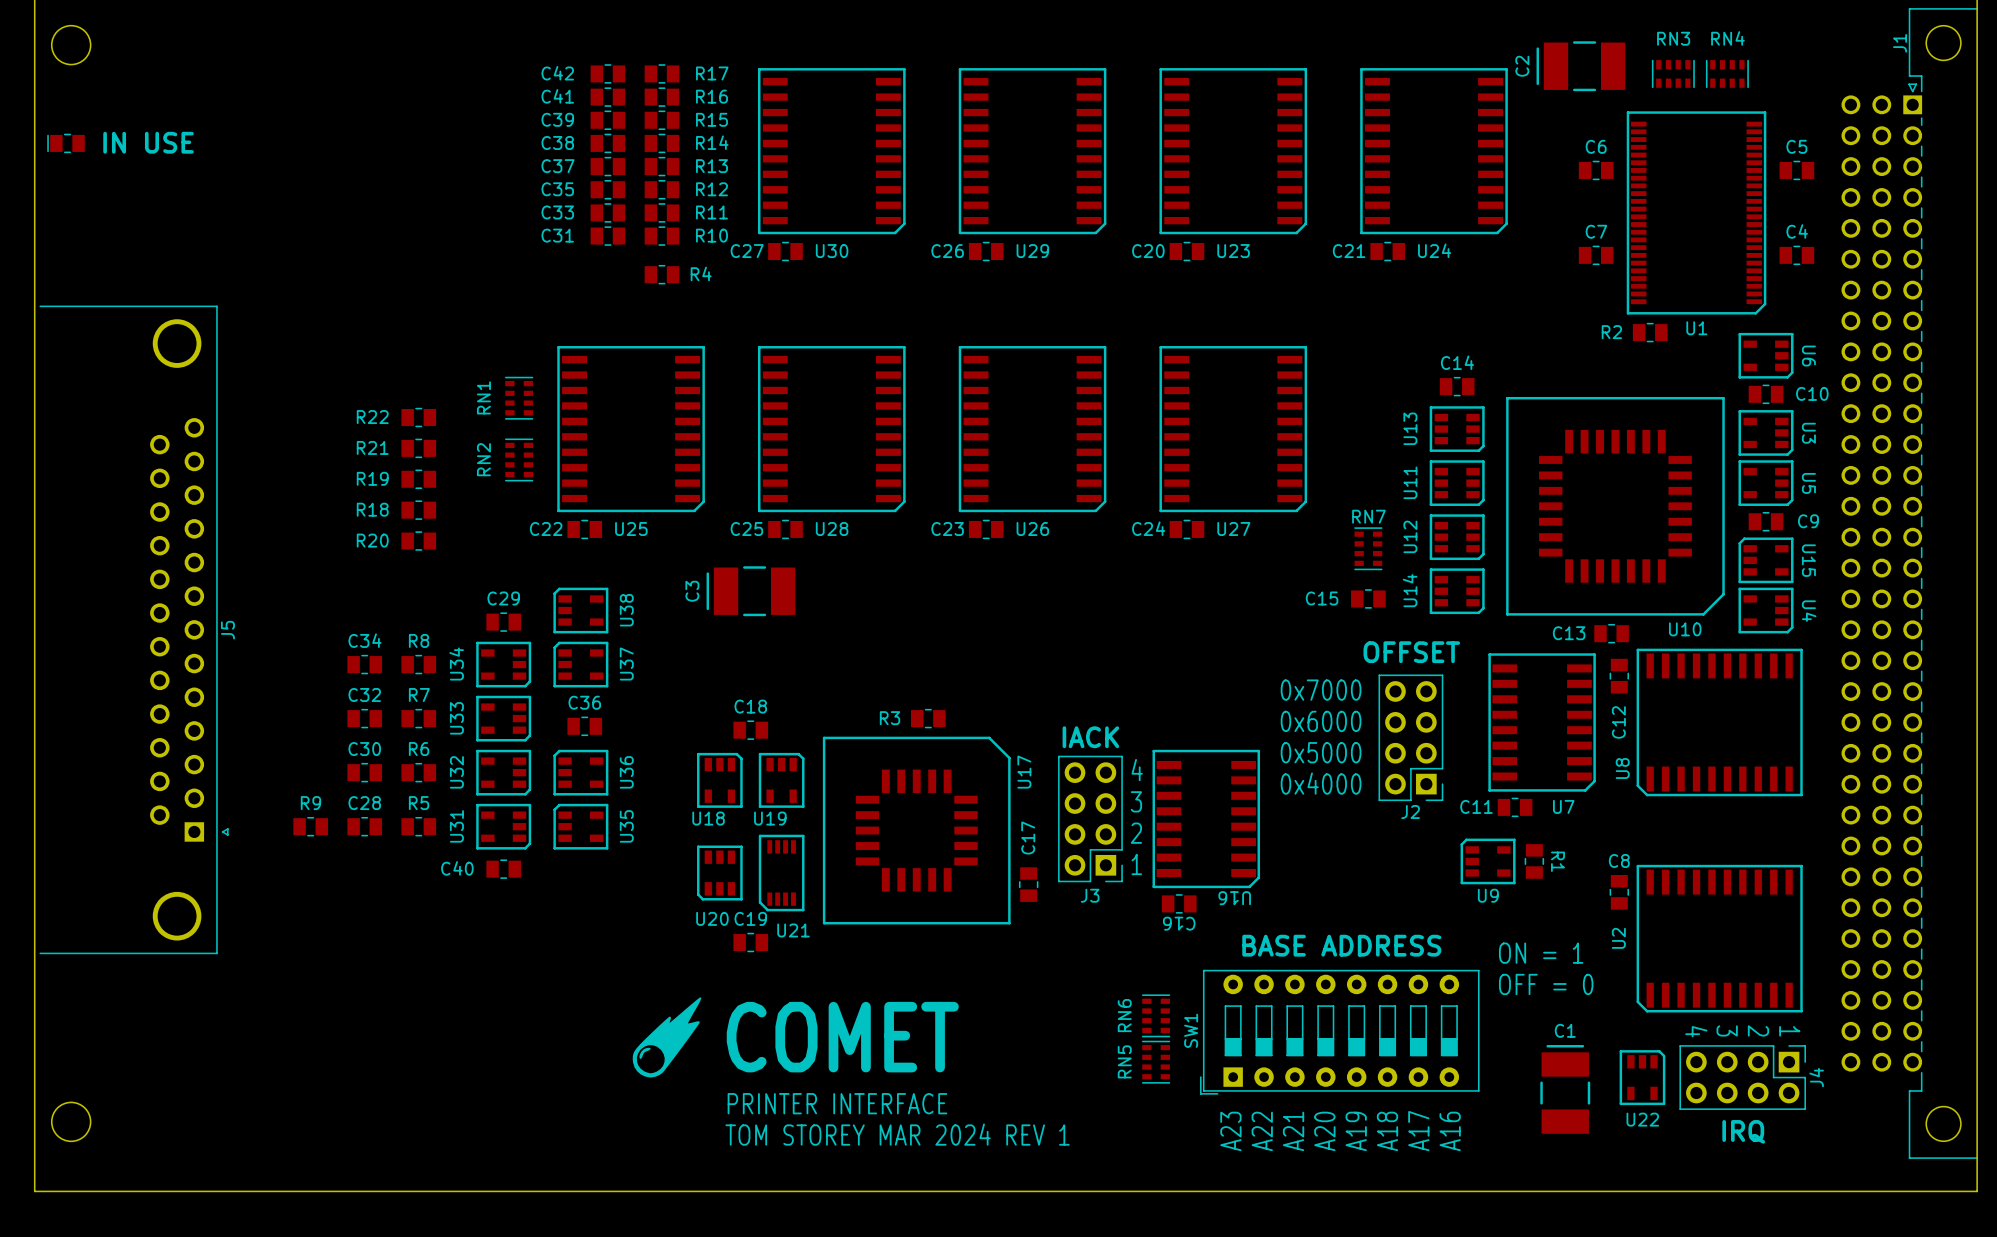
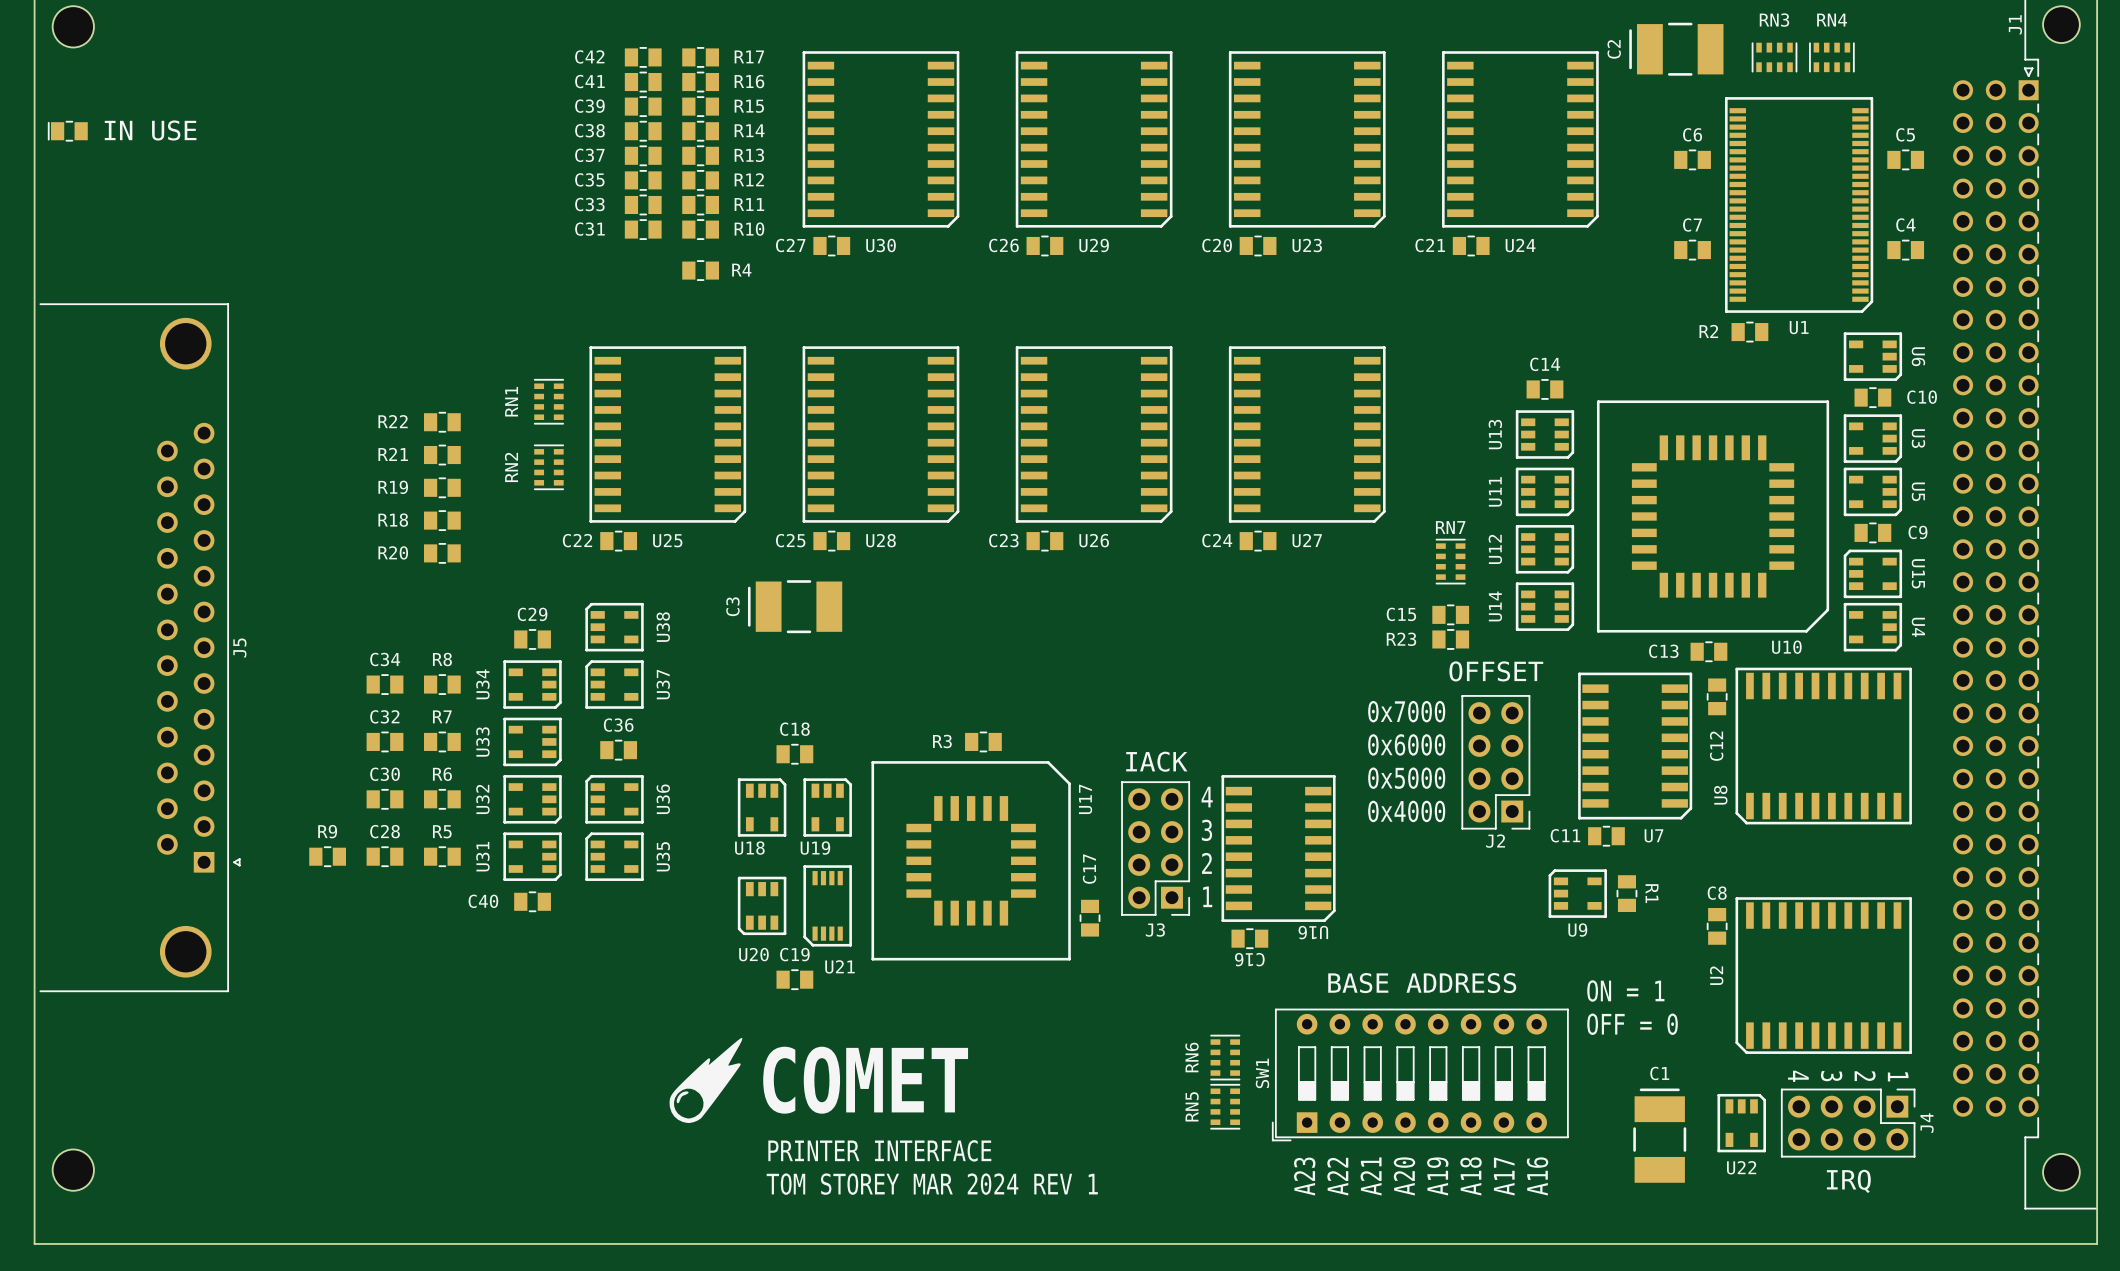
R23: none -> (1450, 639)

